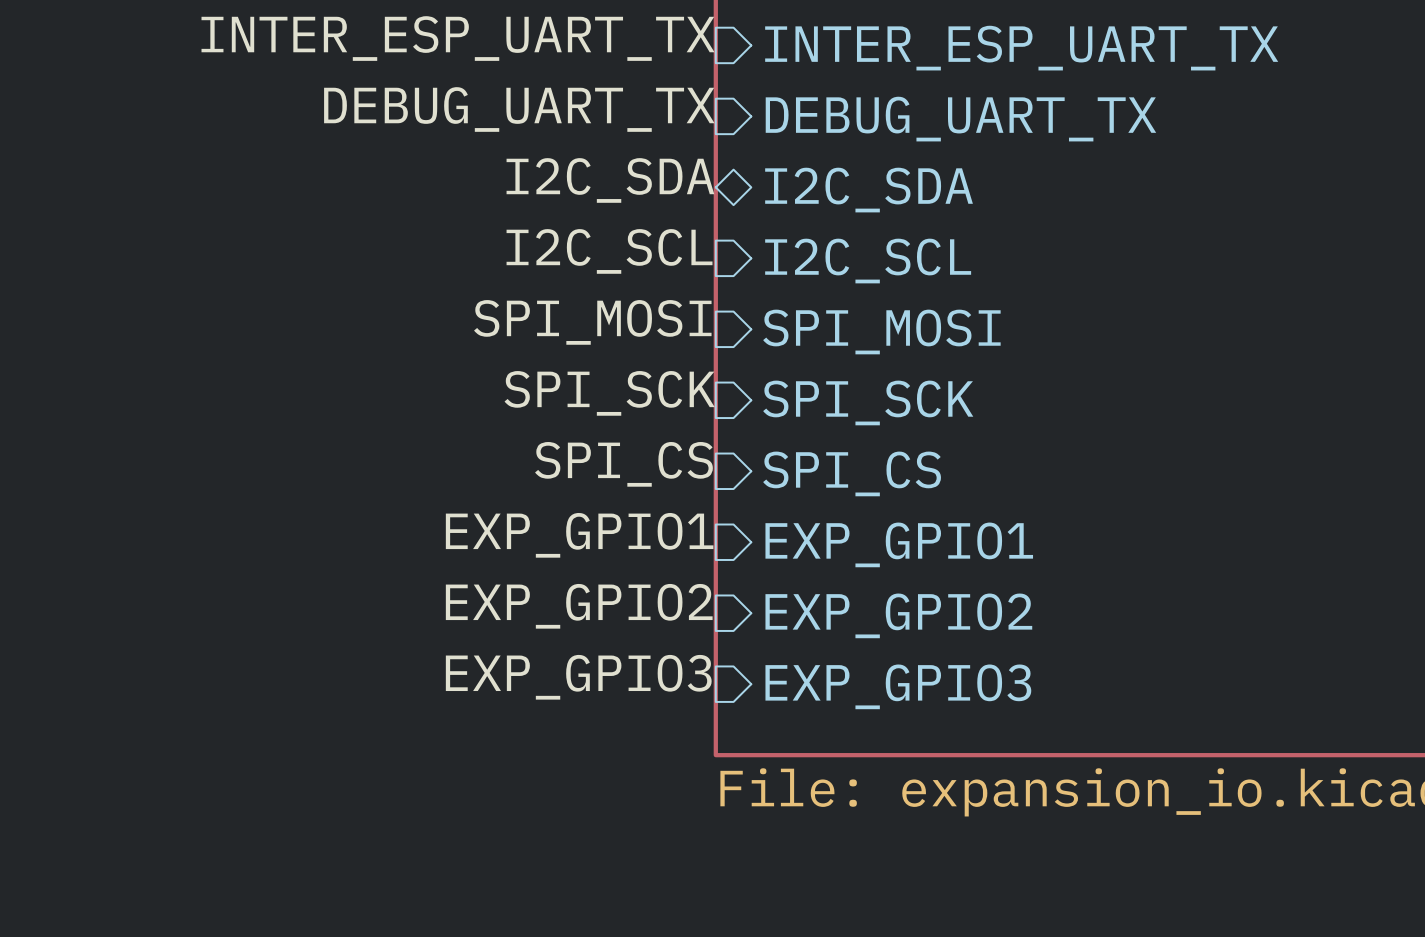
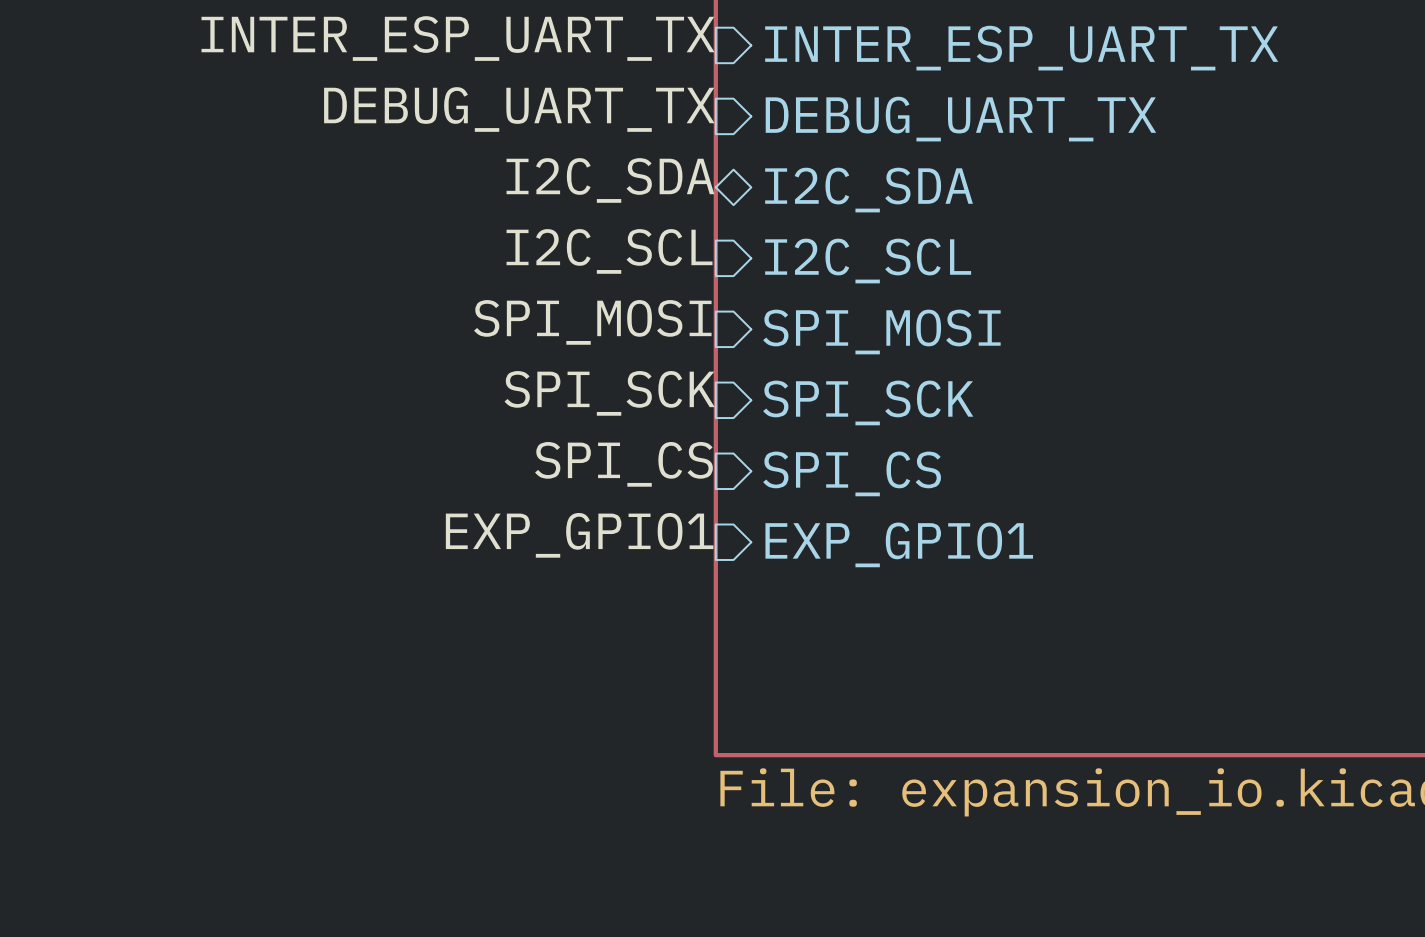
label: EXP_GPIO2 (579, 606) -> none
sheet pin: EXP_GPIO2 (898, 615) -> none
label: EXP_GPIO3 (578, 677) -> none
sheet pin: EXP_GPIO3 (898, 686) -> none

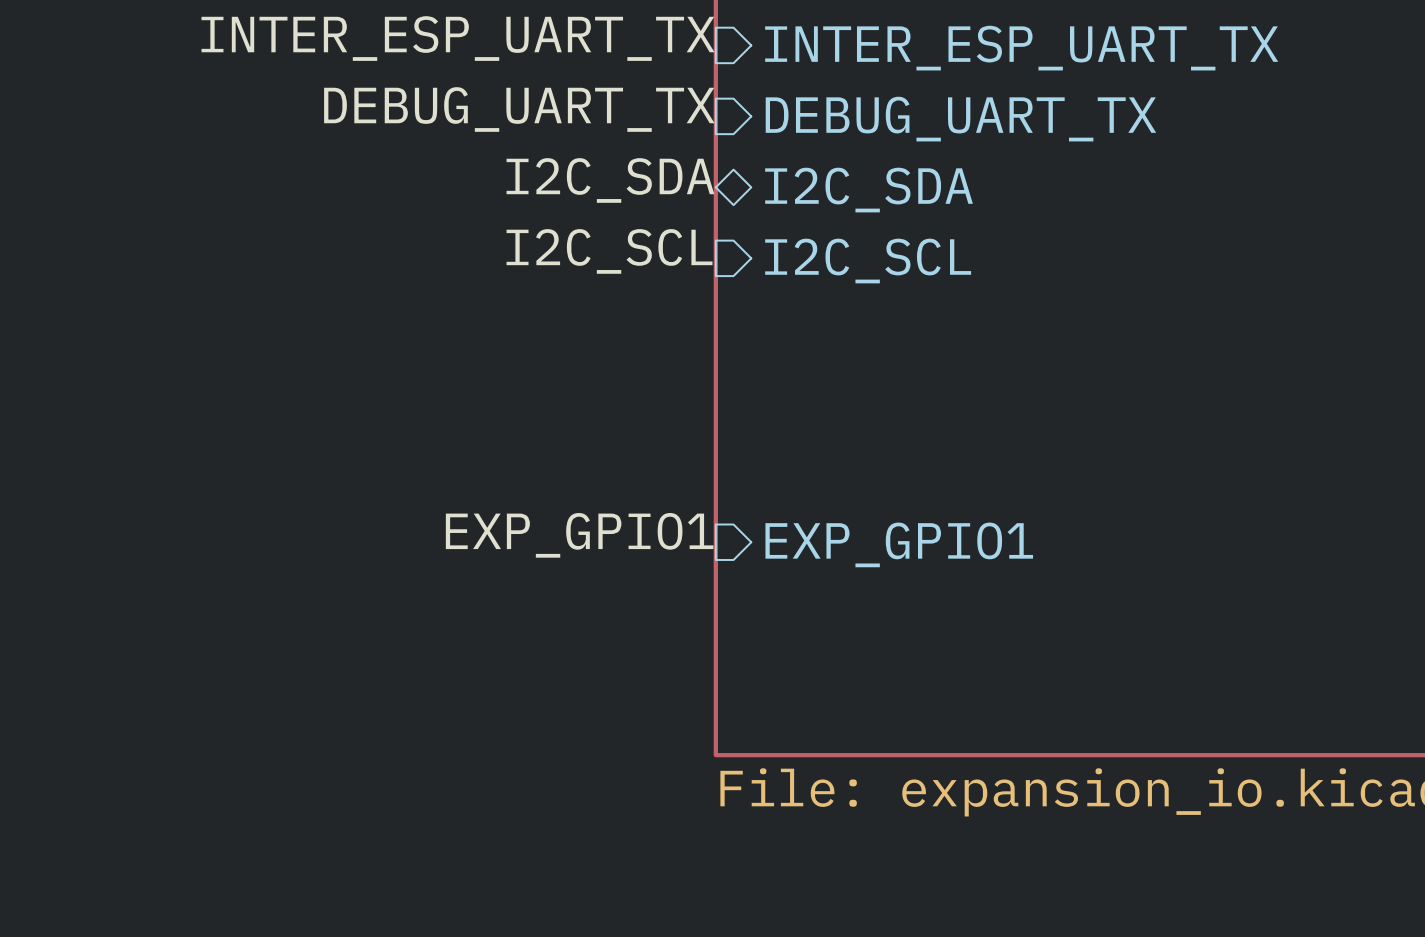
label: SPI_MOSI (592, 322) -> none
sheet pin: SPI_MOSI (881, 331) -> none
label: SPI_SCK (609, 393) -> none
sheet pin: SPI_SCK (868, 402) -> none
label: SPI_CS (623, 464) -> none
sheet pin: SPI_CS (852, 473) -> none

